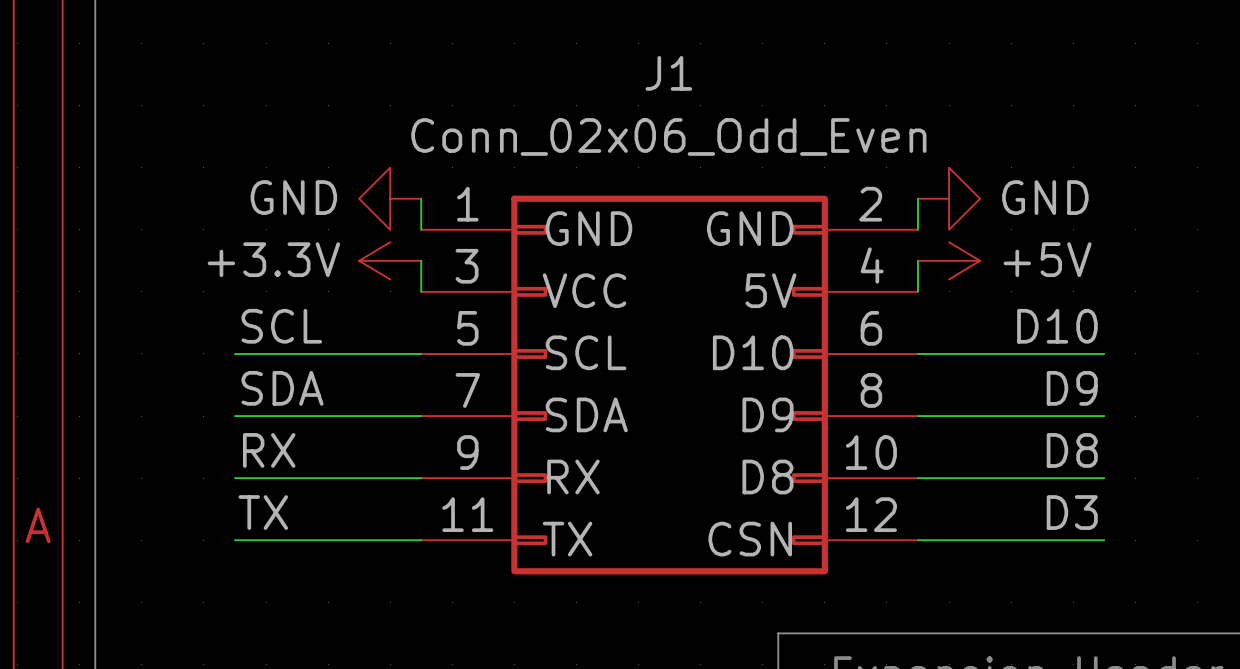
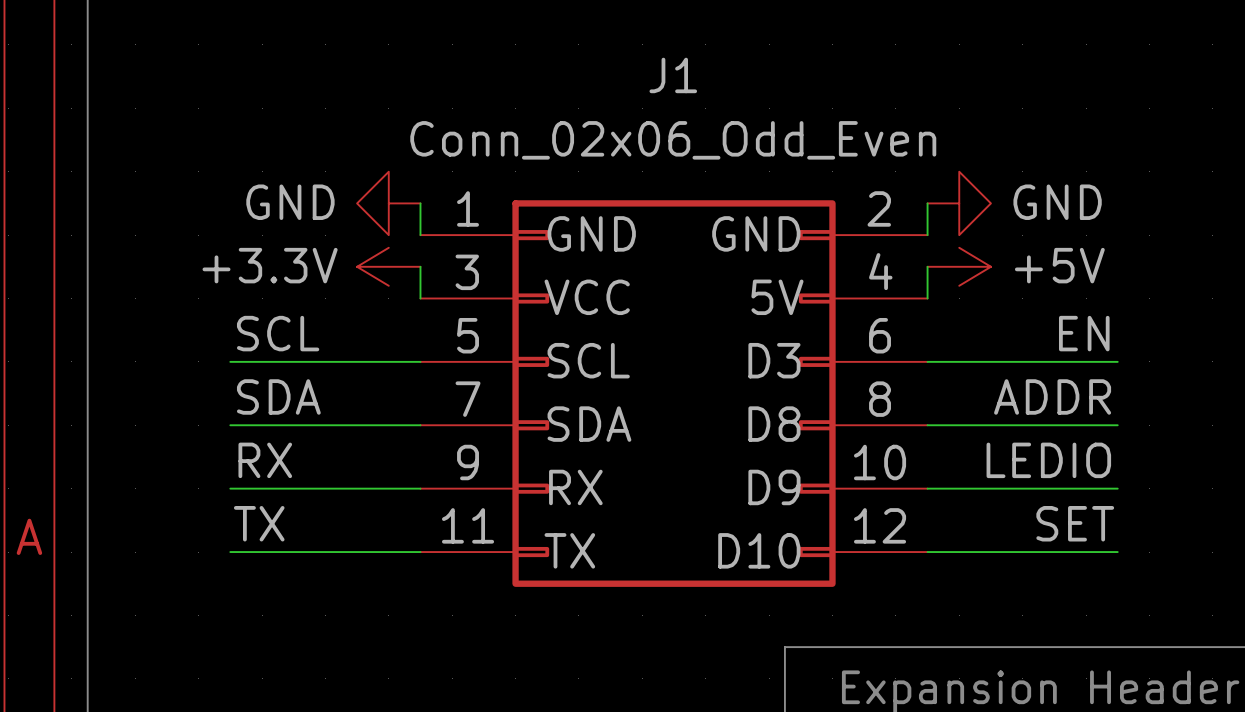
label: D10 (1057, 326) -> EN (1084, 333)
J1 pin name: D10 (753, 352) -> D3 (774, 360)
label: D9 (1072, 388) -> ADDR (1052, 396)
J1 pin name: D9 (767, 414) -> D8 (774, 424)
label: D8 (1072, 450) -> LEDIO (1048, 460)
J1 pin name: D8 (767, 476) -> D9 (774, 487)
label: D3 (1072, 512) -> SET (1075, 523)
J1 pin name: CSN (750, 539) -> D10 (759, 550)

